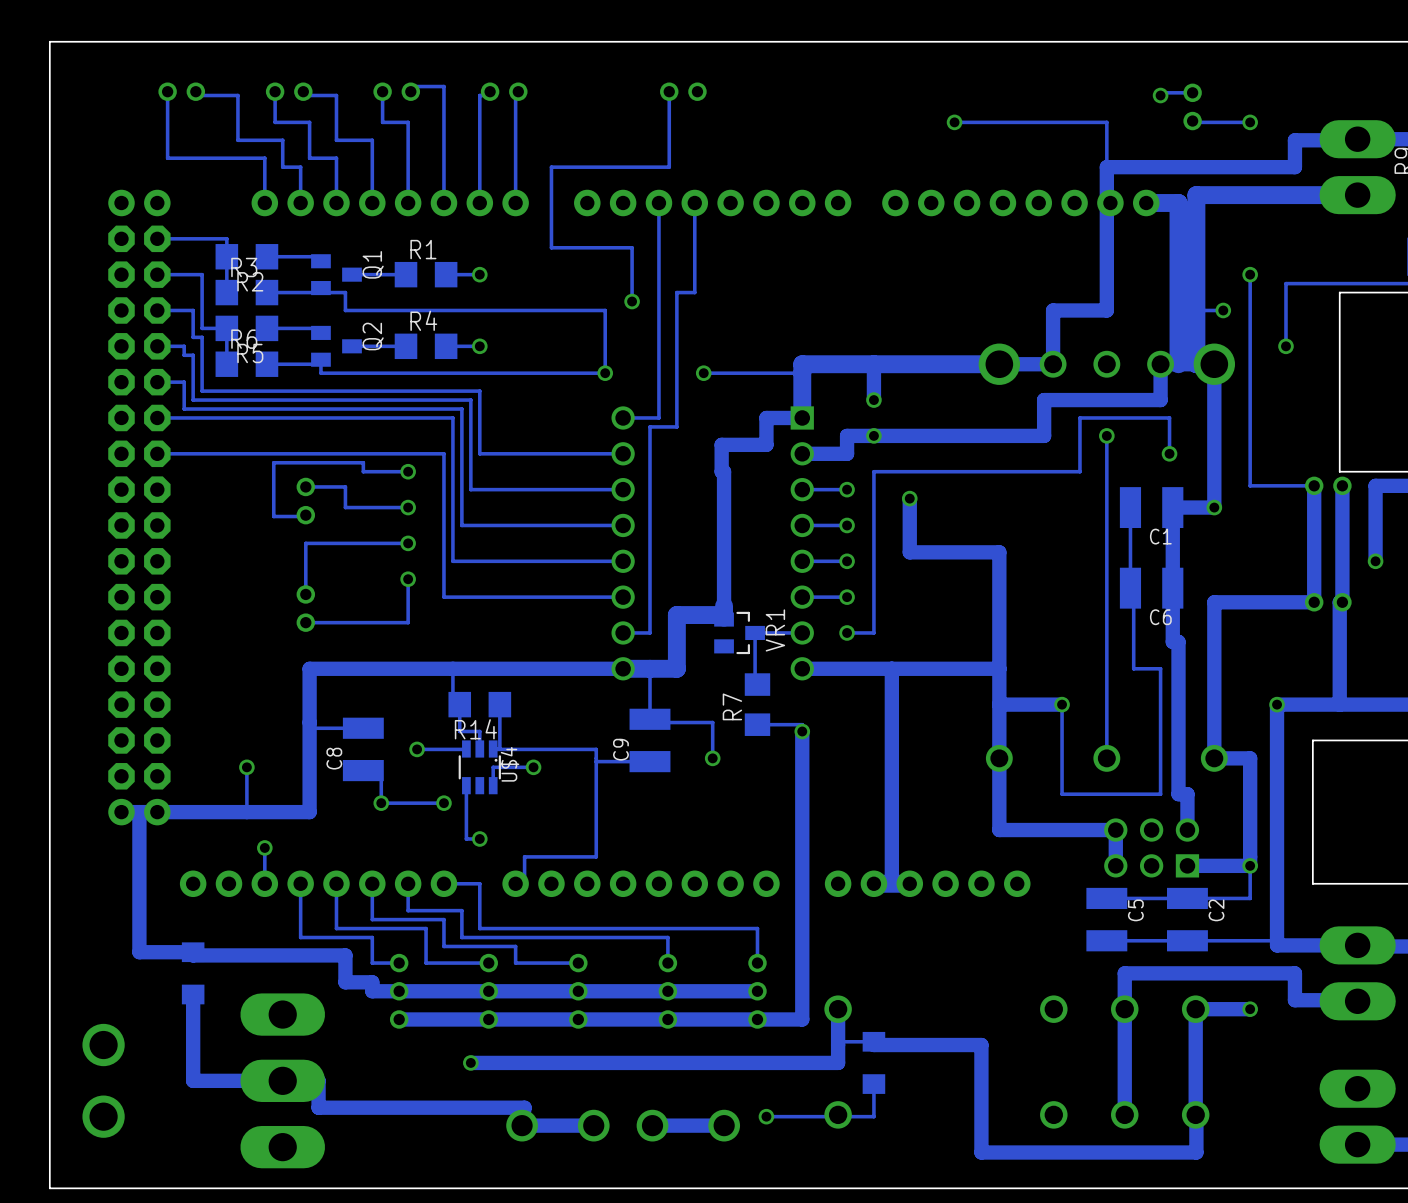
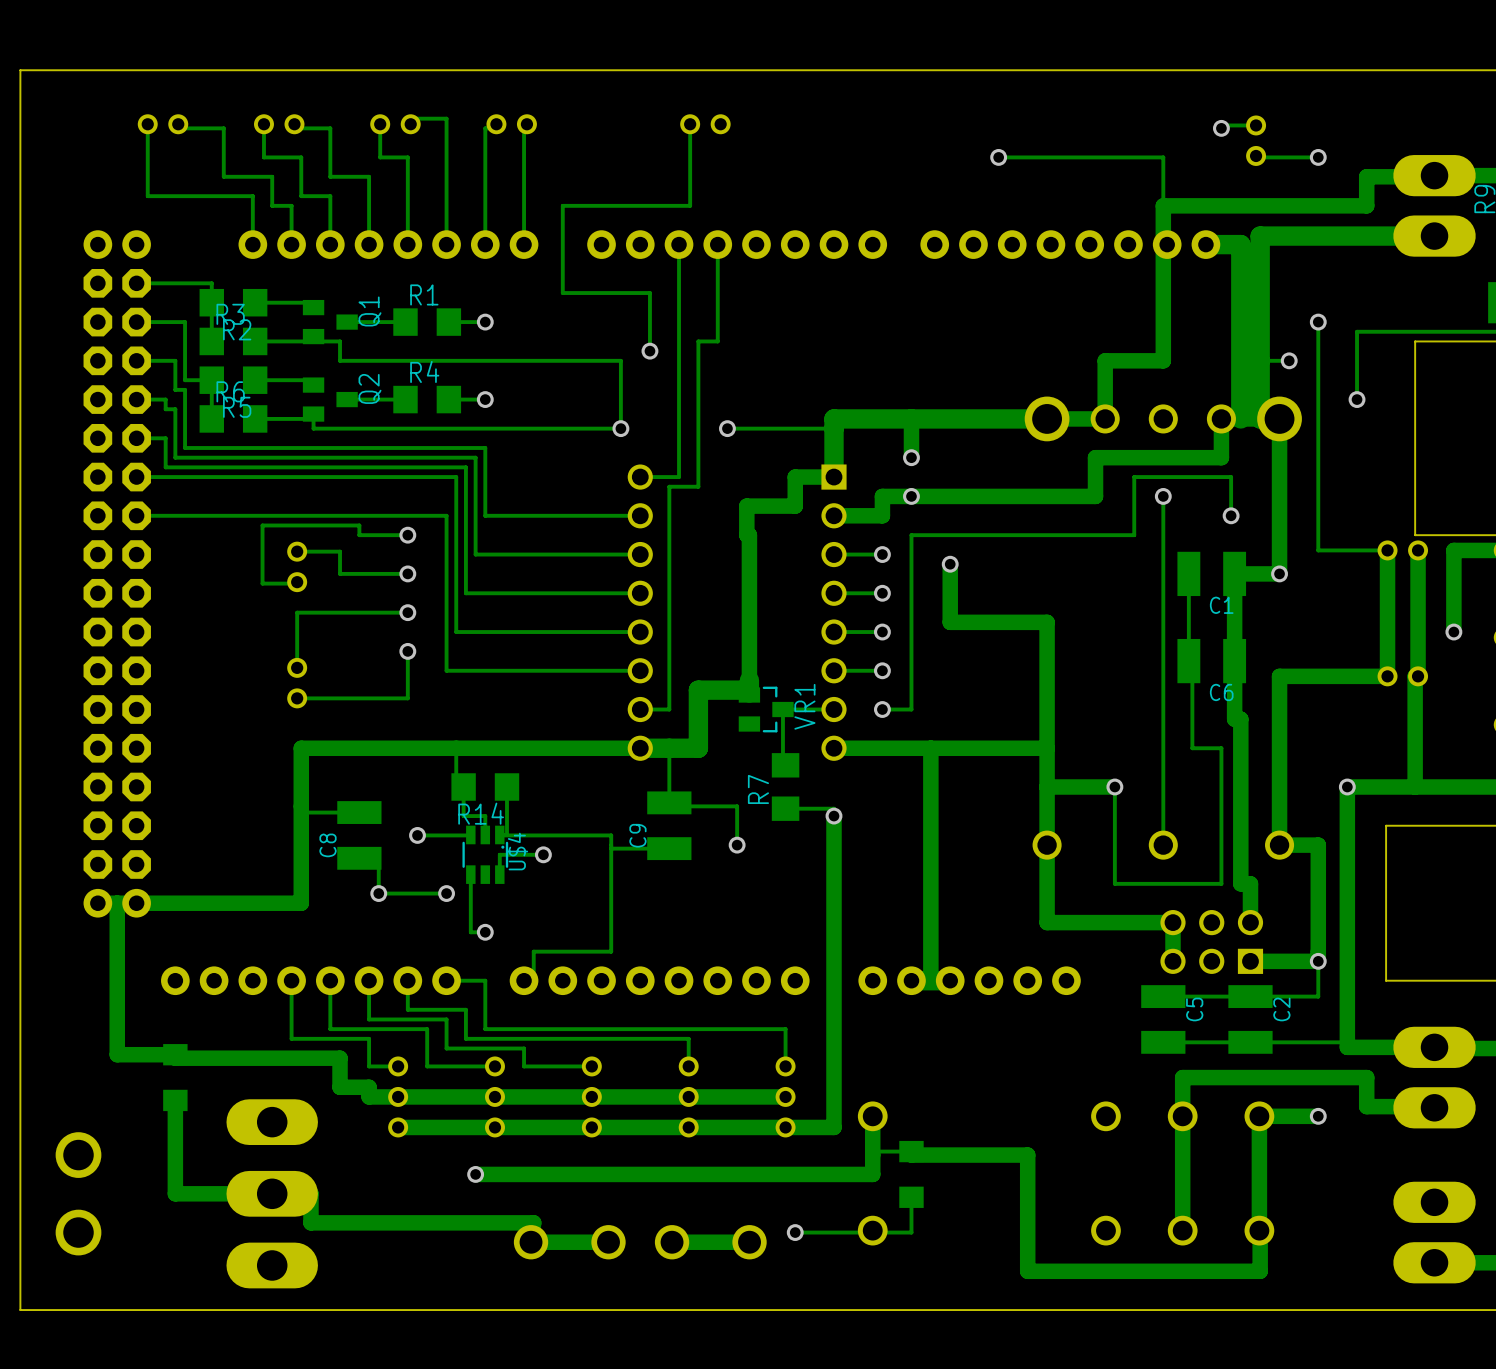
track: (246, 767) (246, 812) -> none
via: (246, 767) -> none
track: (264, 847) (264, 883) -> none
via: (264, 847) -> none

